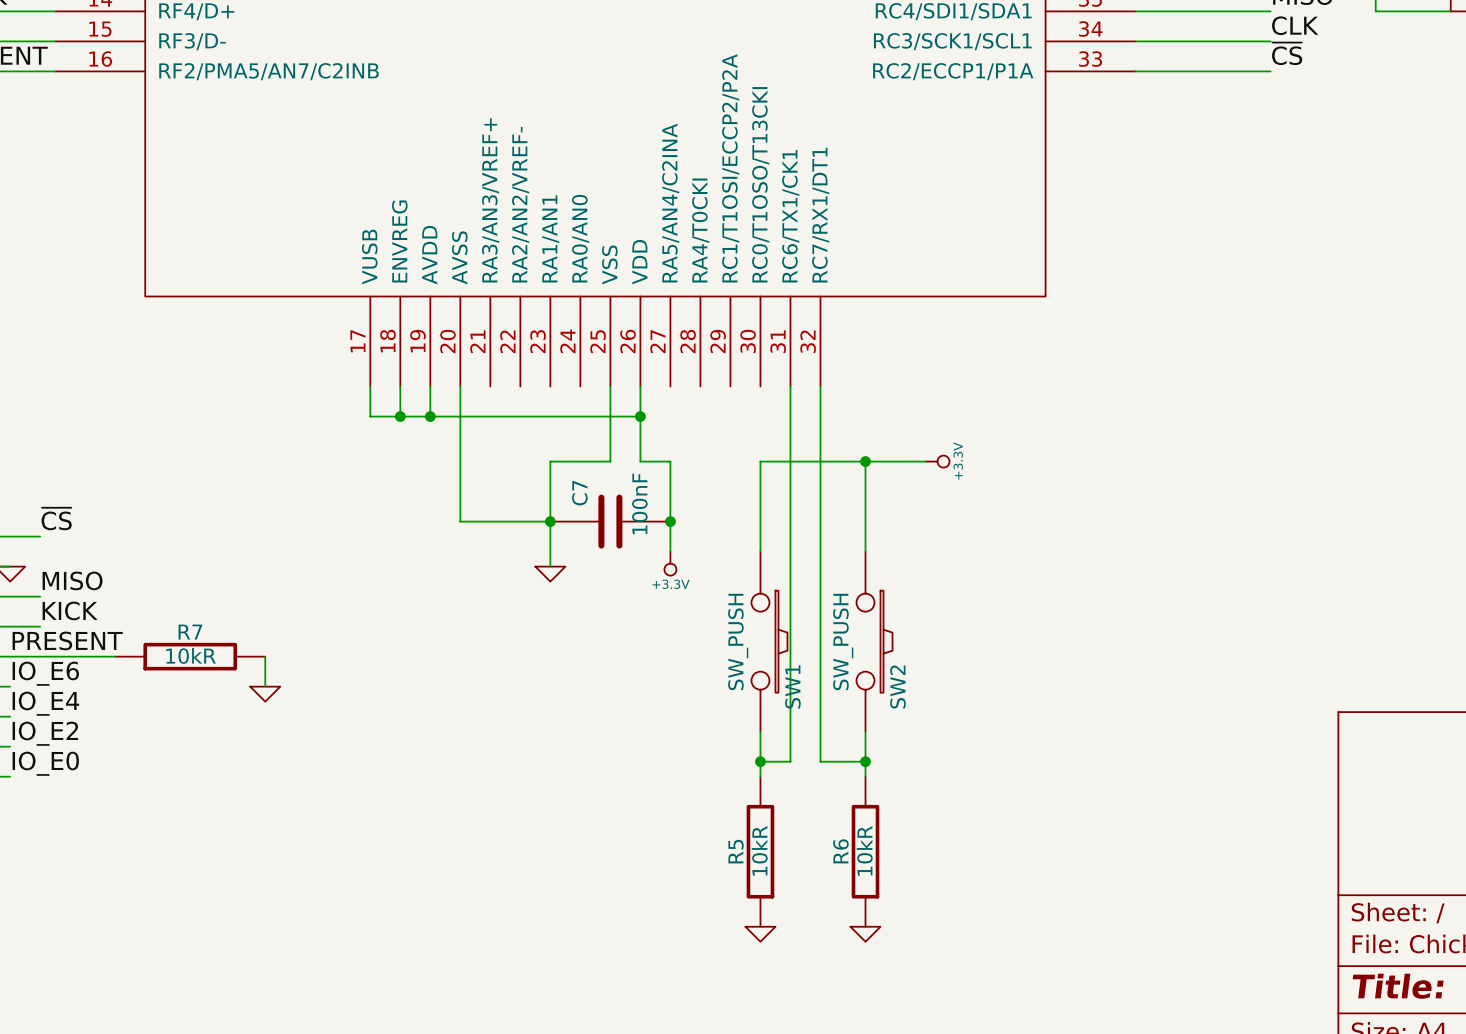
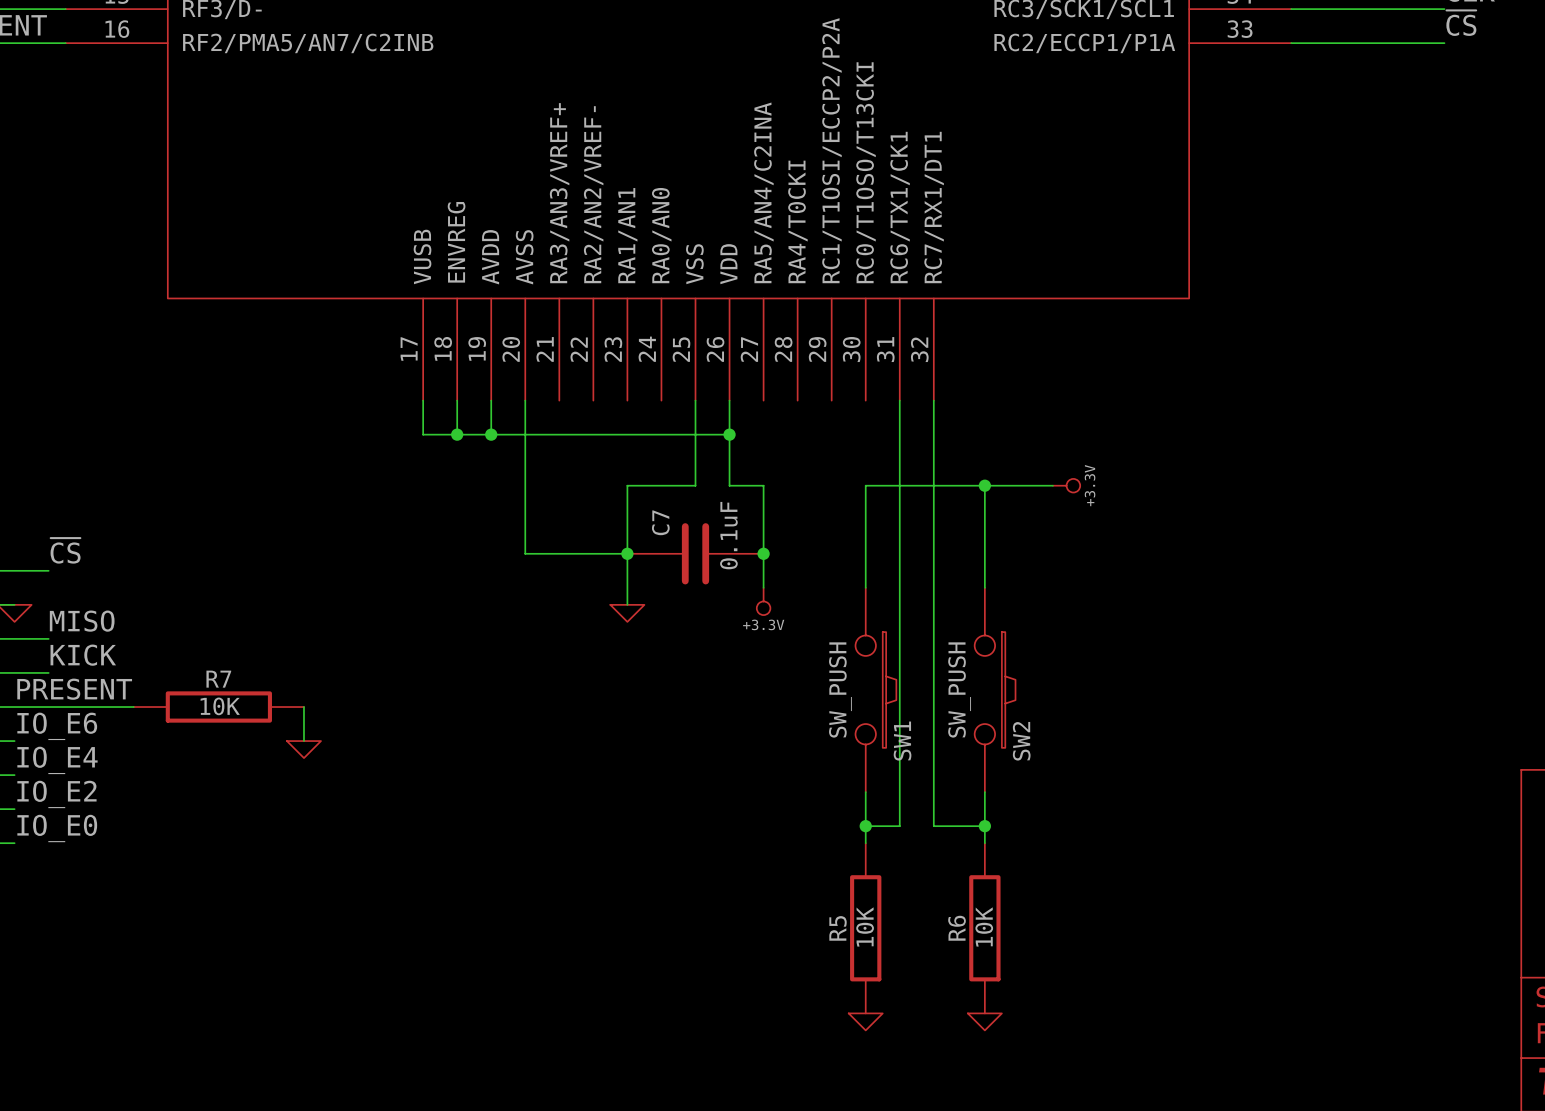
C7 value: 100nF (639, 503) -> 0.1uF (728, 535)
R7 value: 10kR (191, 655) -> 10K (220, 706)
R5 value: 10kR (759, 850) -> 10K (865, 926)
R6 value: 10kR (864, 850) -> 10K (984, 926)

